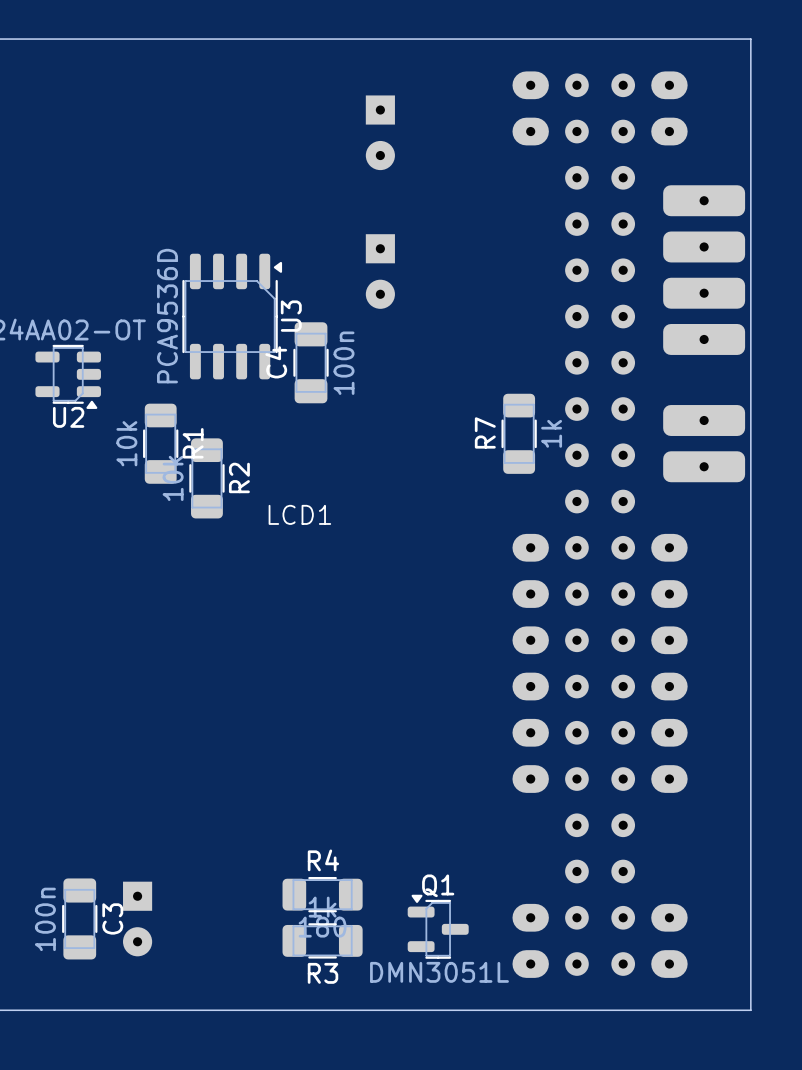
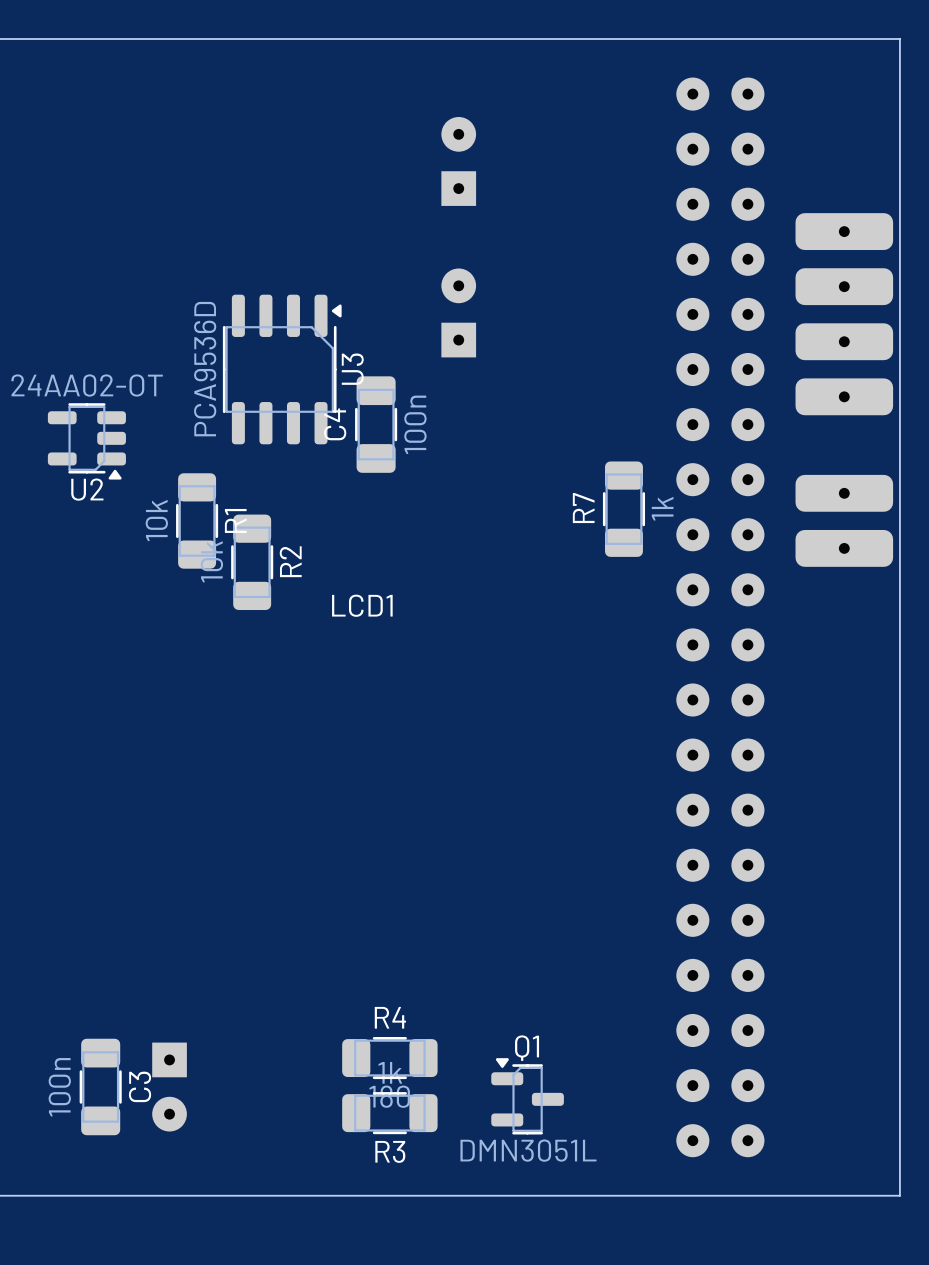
LCD1 footprint: [512, 71, 688, 978] -> [676, 77, 765, 1158]
part rotation: 0° (380, 132) -> 180° (458, 161)
part rotation: 0° (380, 271) -> 180° (458, 312)

